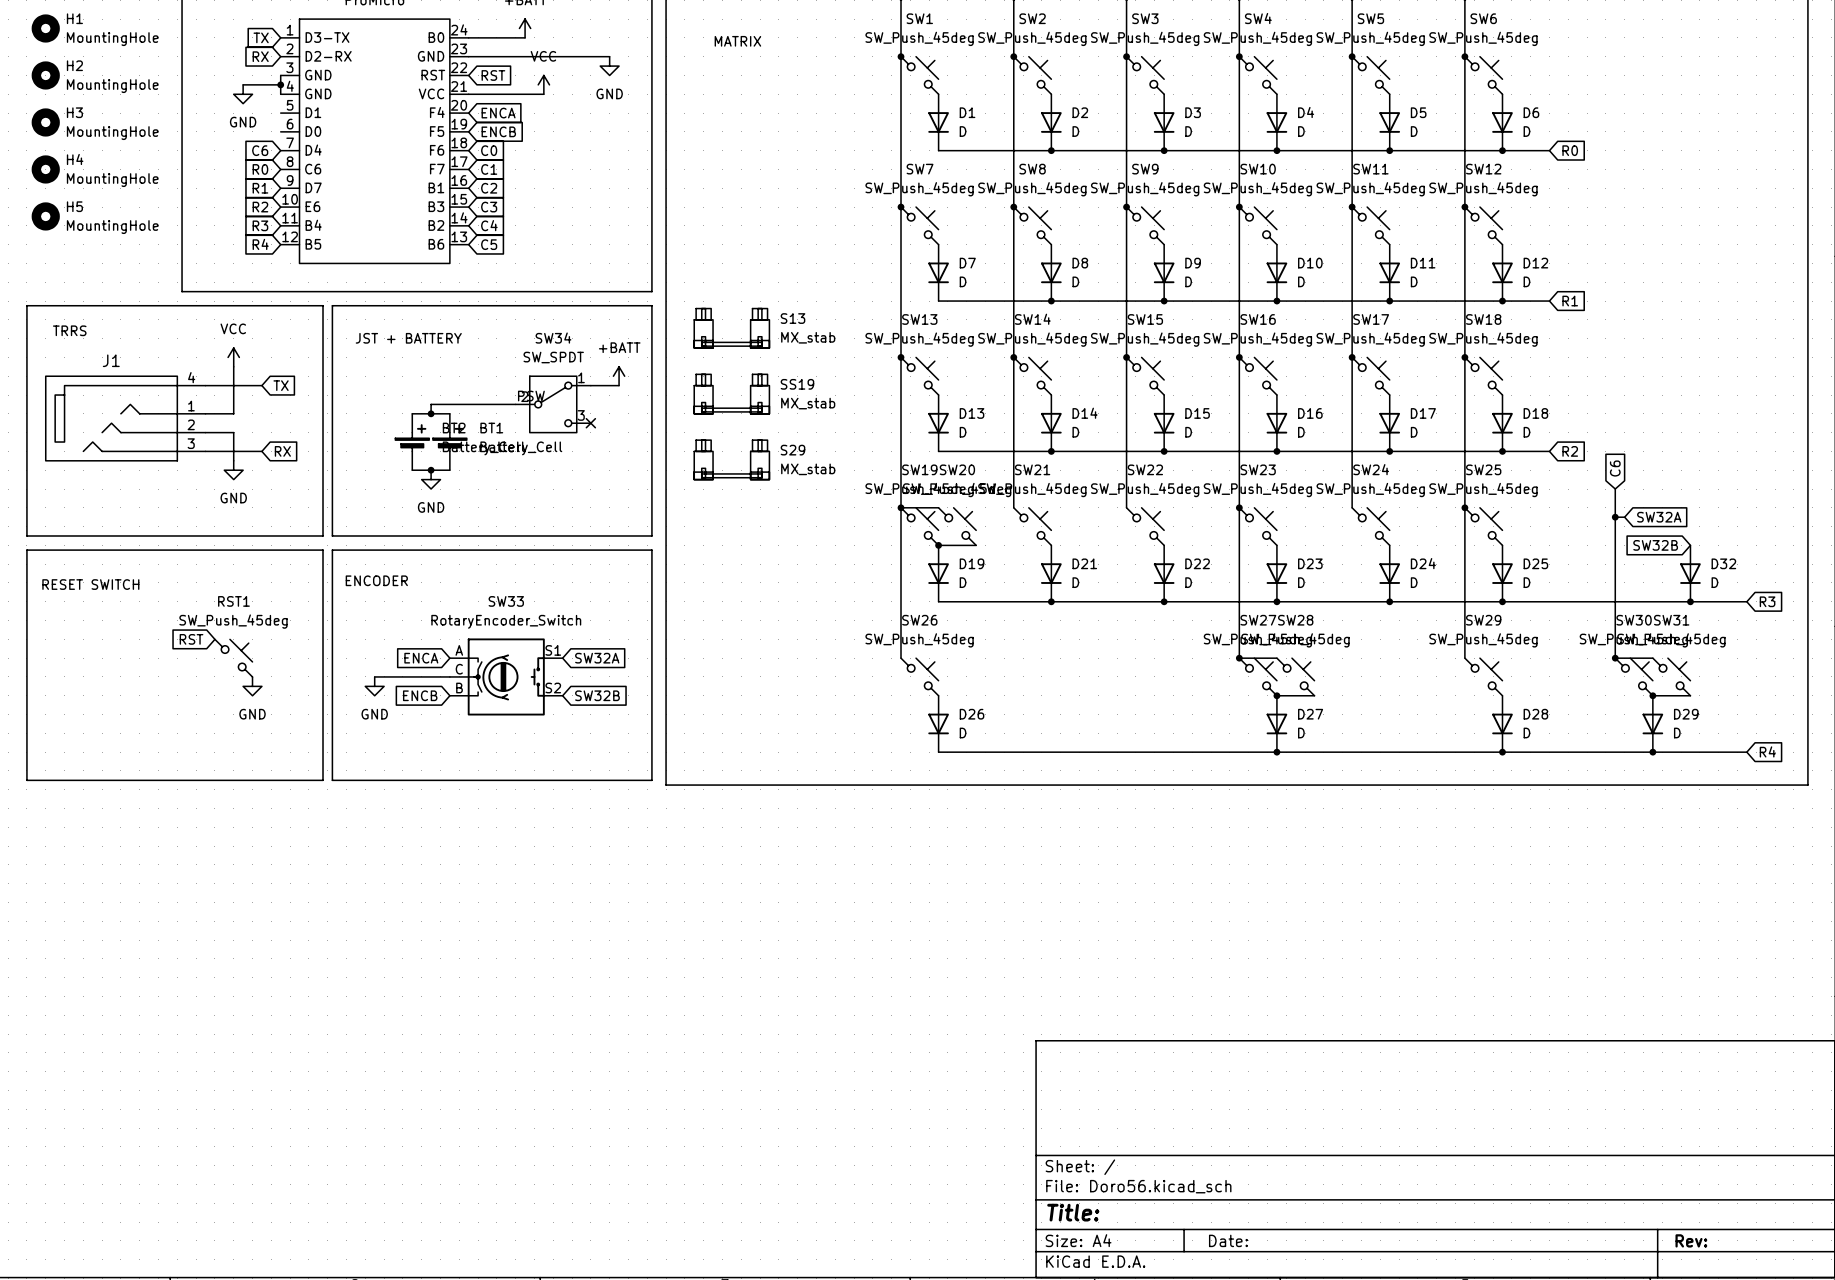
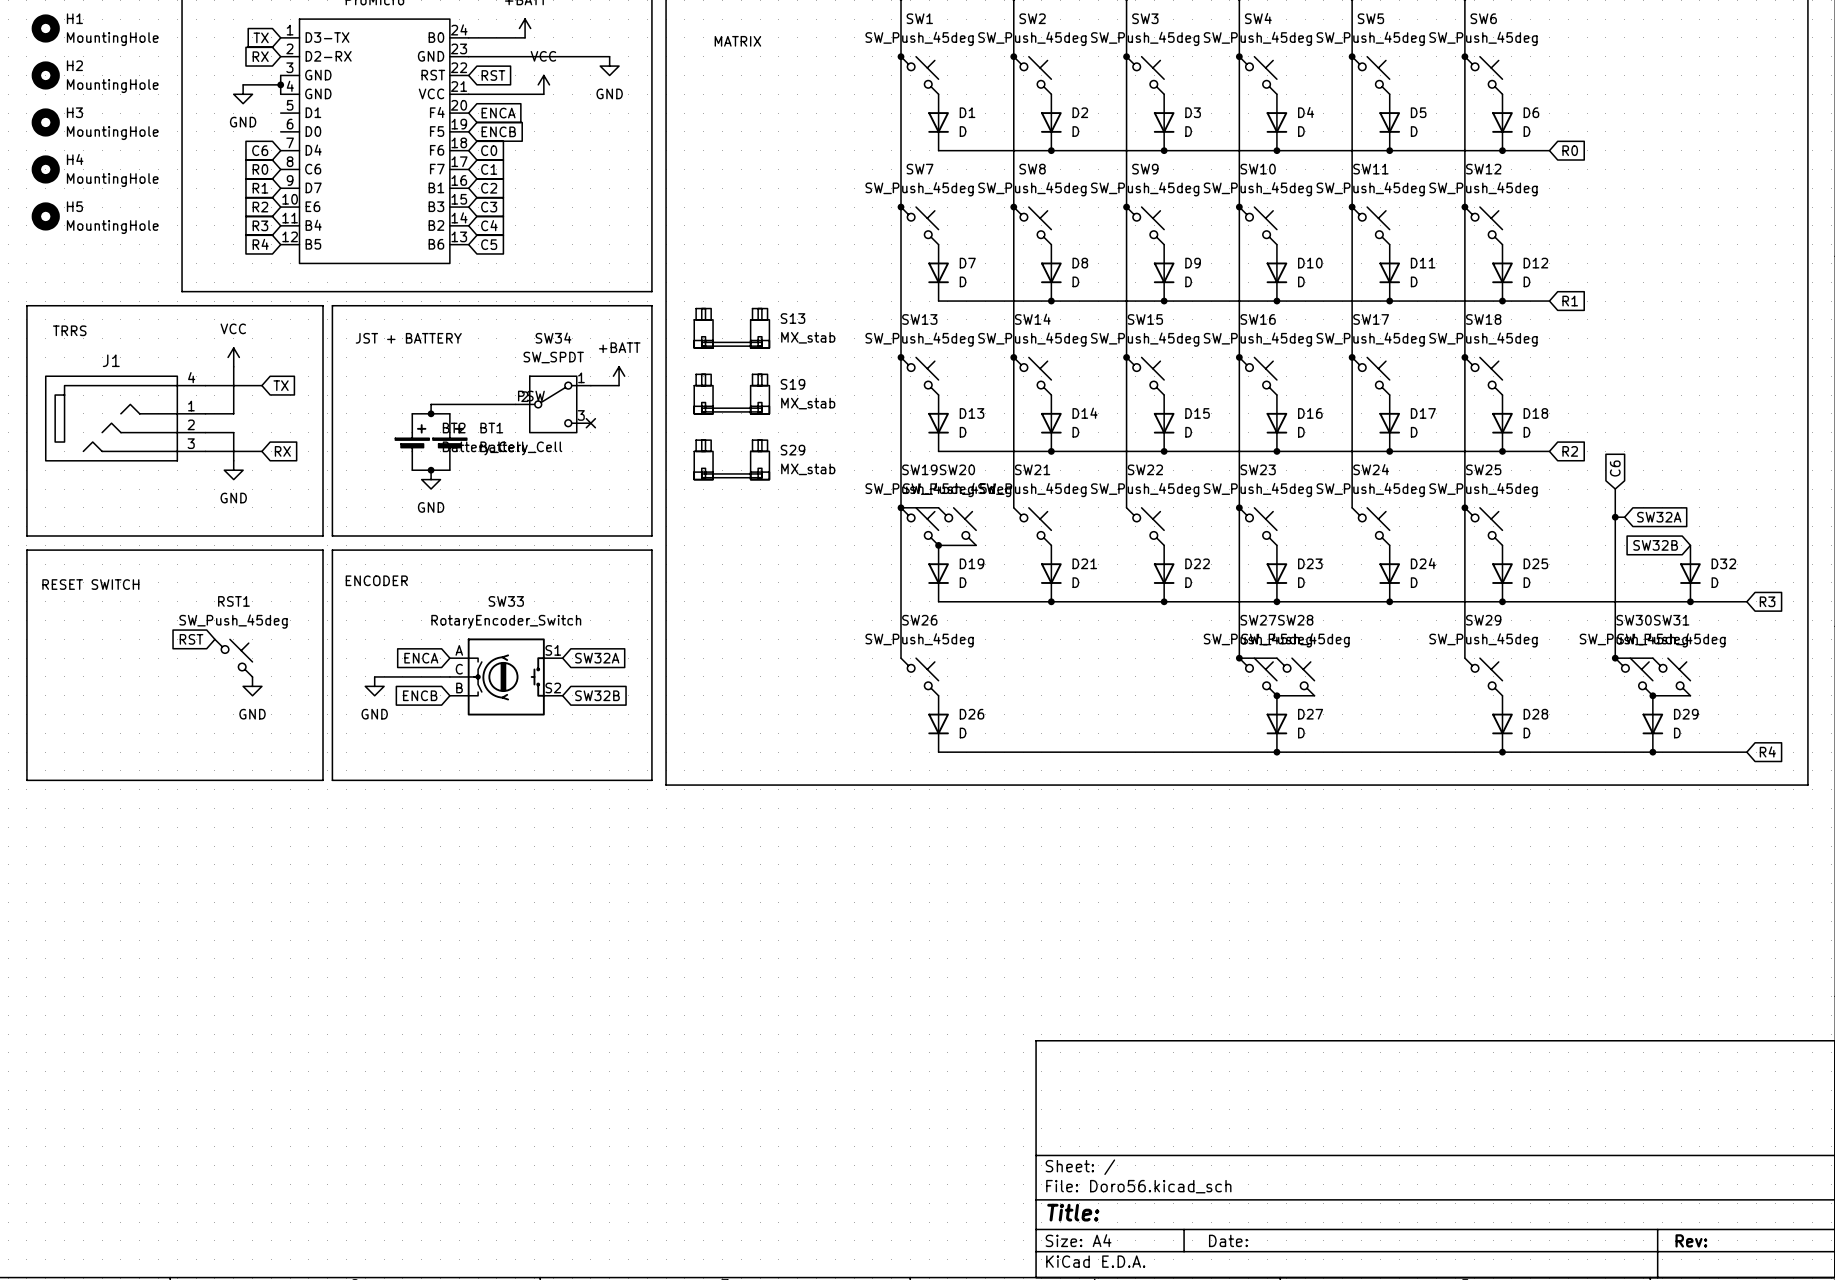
SS19 name: SS19 (797, 384) -> S19 (792, 384)

